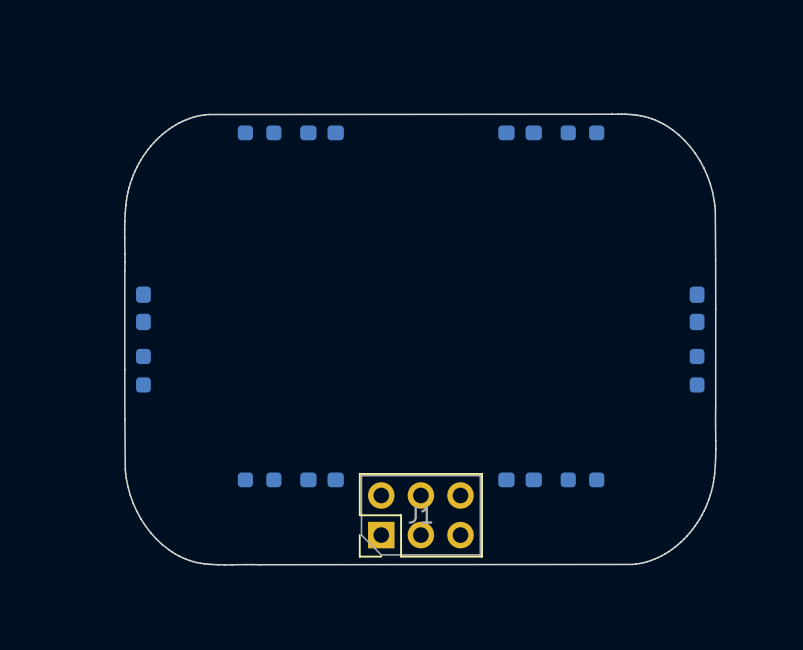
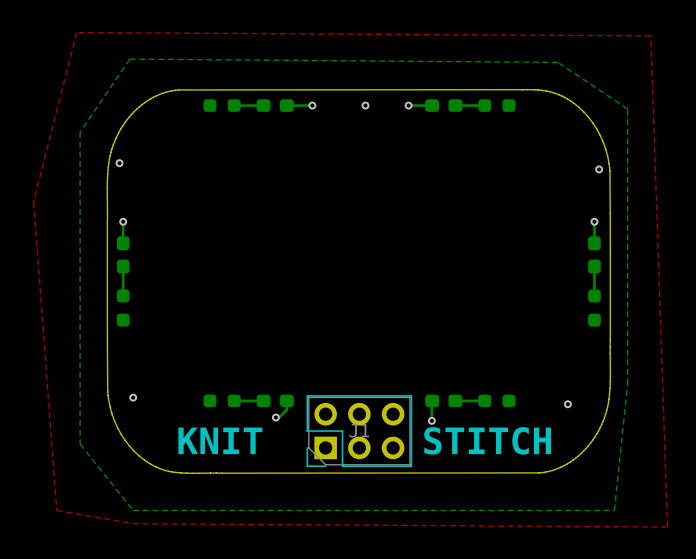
top zone outline: none -> (76, 32) (650, 35) (667, 527) (133, 523) (56, 510) (33, 201) (76, 32)
bottom zone outline: none -> (129, 59) (557, 62) (627, 108) (627, 384) (614, 510) (133, 510) (80, 444) (80, 132) (129, 59)
bottom track: none -> (234, 105) (263, 105)
bottom track: none -> (286, 105) (312, 105)
via: none -> (312, 105)
via: none -> (365, 105)
bottom track: none -> (408, 105) (432, 105)
via: none -> (408, 105)
bottom track: none -> (455, 105) (484, 105)
via: none -> (119, 163)
via: none -> (599, 169)
bottom track: none -> (123, 221) (123, 243)
via: none -> (123, 221)
bottom track: none -> (594, 221) (594, 243)
via: none -> (594, 221)
bottom track: none -> (123, 266) (123, 295)
bottom track: none -> (594, 266) (594, 295)
via: none -> (133, 397)
bottom track: none -> (234, 400) (263, 400)
bottom track: none -> (286, 400) (286, 409) (279, 417) (275, 417)
bottom track: none -> (432, 400) (431, 420)
bottom track: none -> (455, 400) (484, 400)
via: none -> (567, 404)
via: none -> (275, 417)
via: none -> (431, 420)
text: none -> KNIT (220, 440)
text: none -> STITCH (487, 440)

